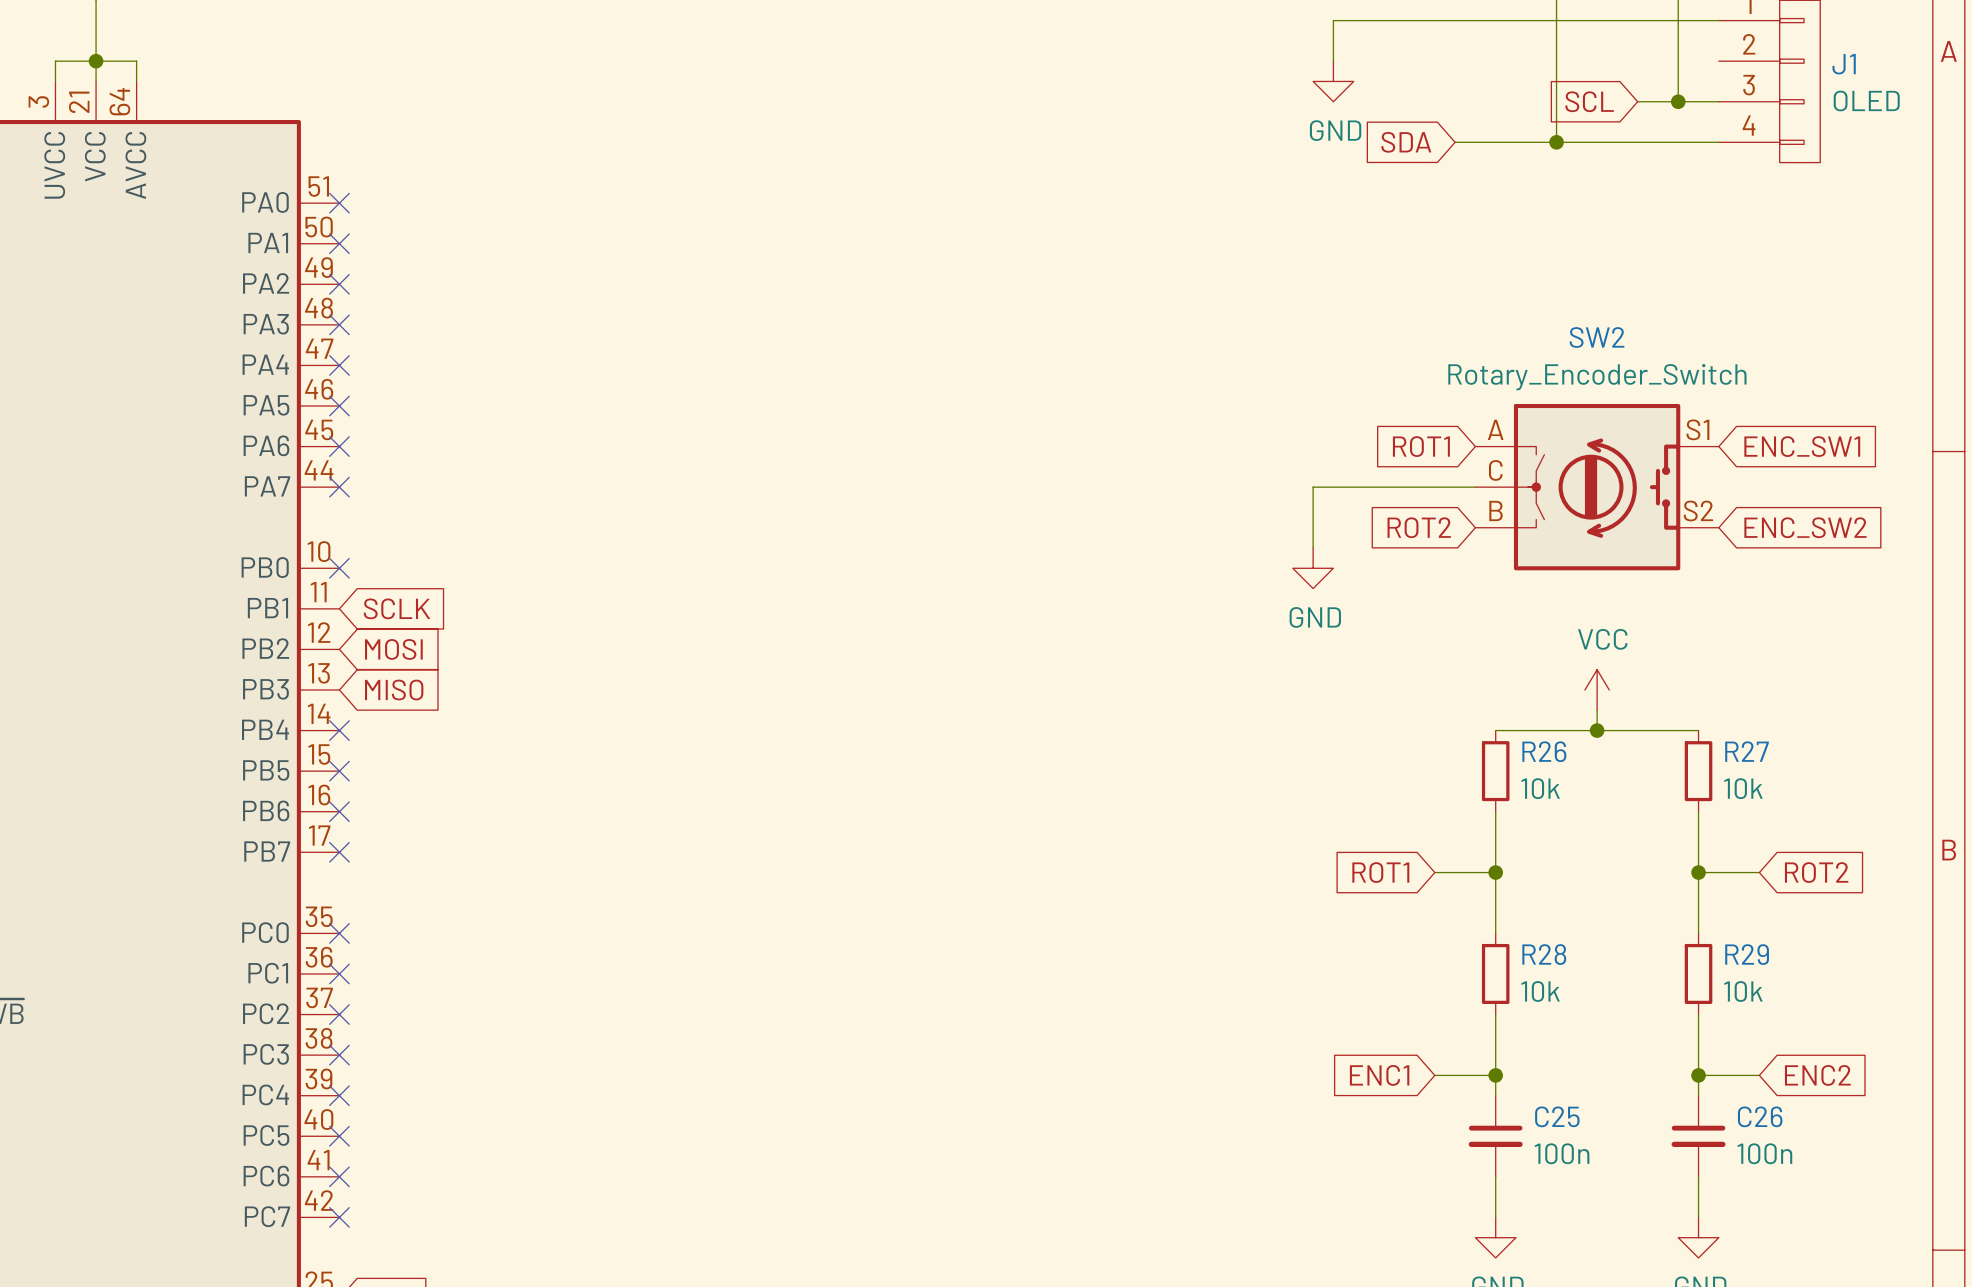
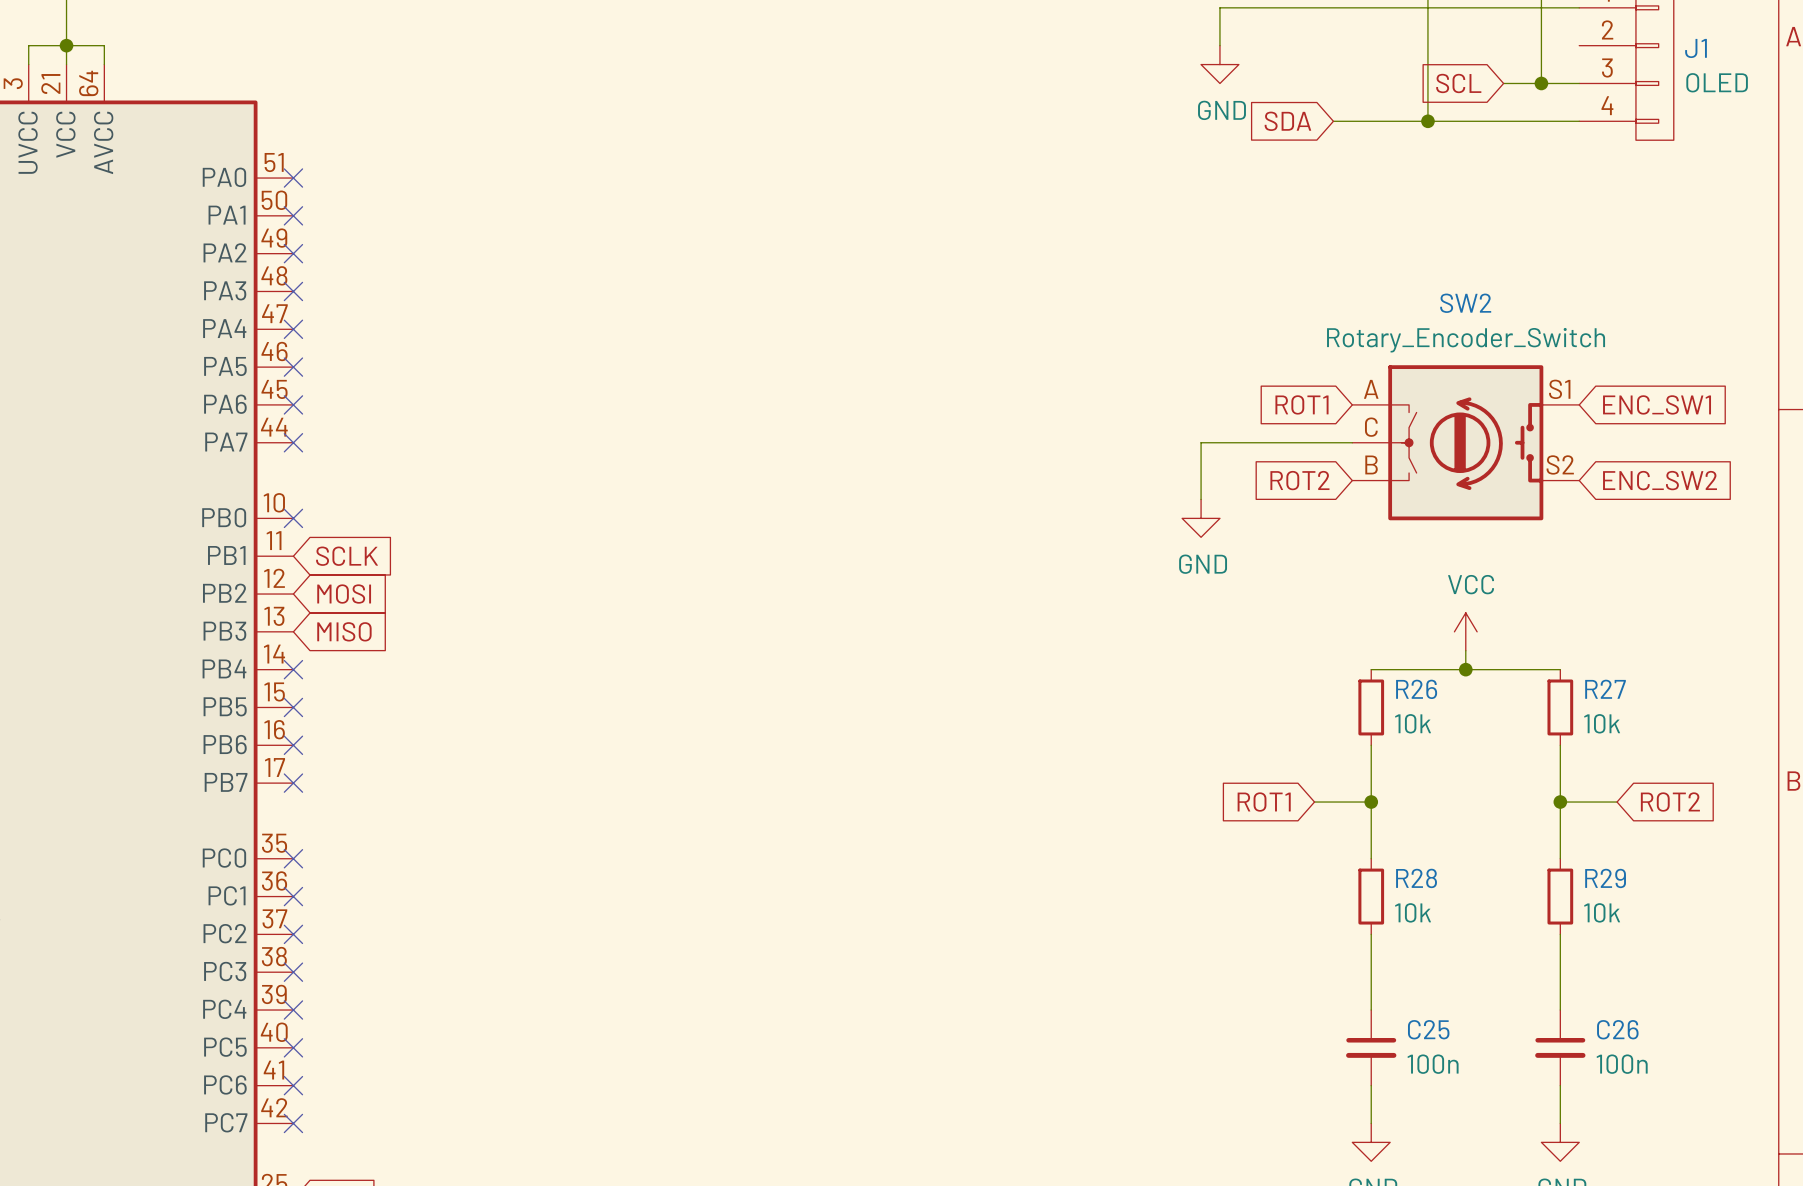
global label: ENC1 (1379, 1075) -> none
wire: (1434, 1075) (1495, 1075) -> none
junction: (1495, 1075) -> none
wire: (1698, 1075) (1759, 1075) -> none
junction: (1698, 1075) -> none
global label: ENC2 (1817, 1075) -> none

